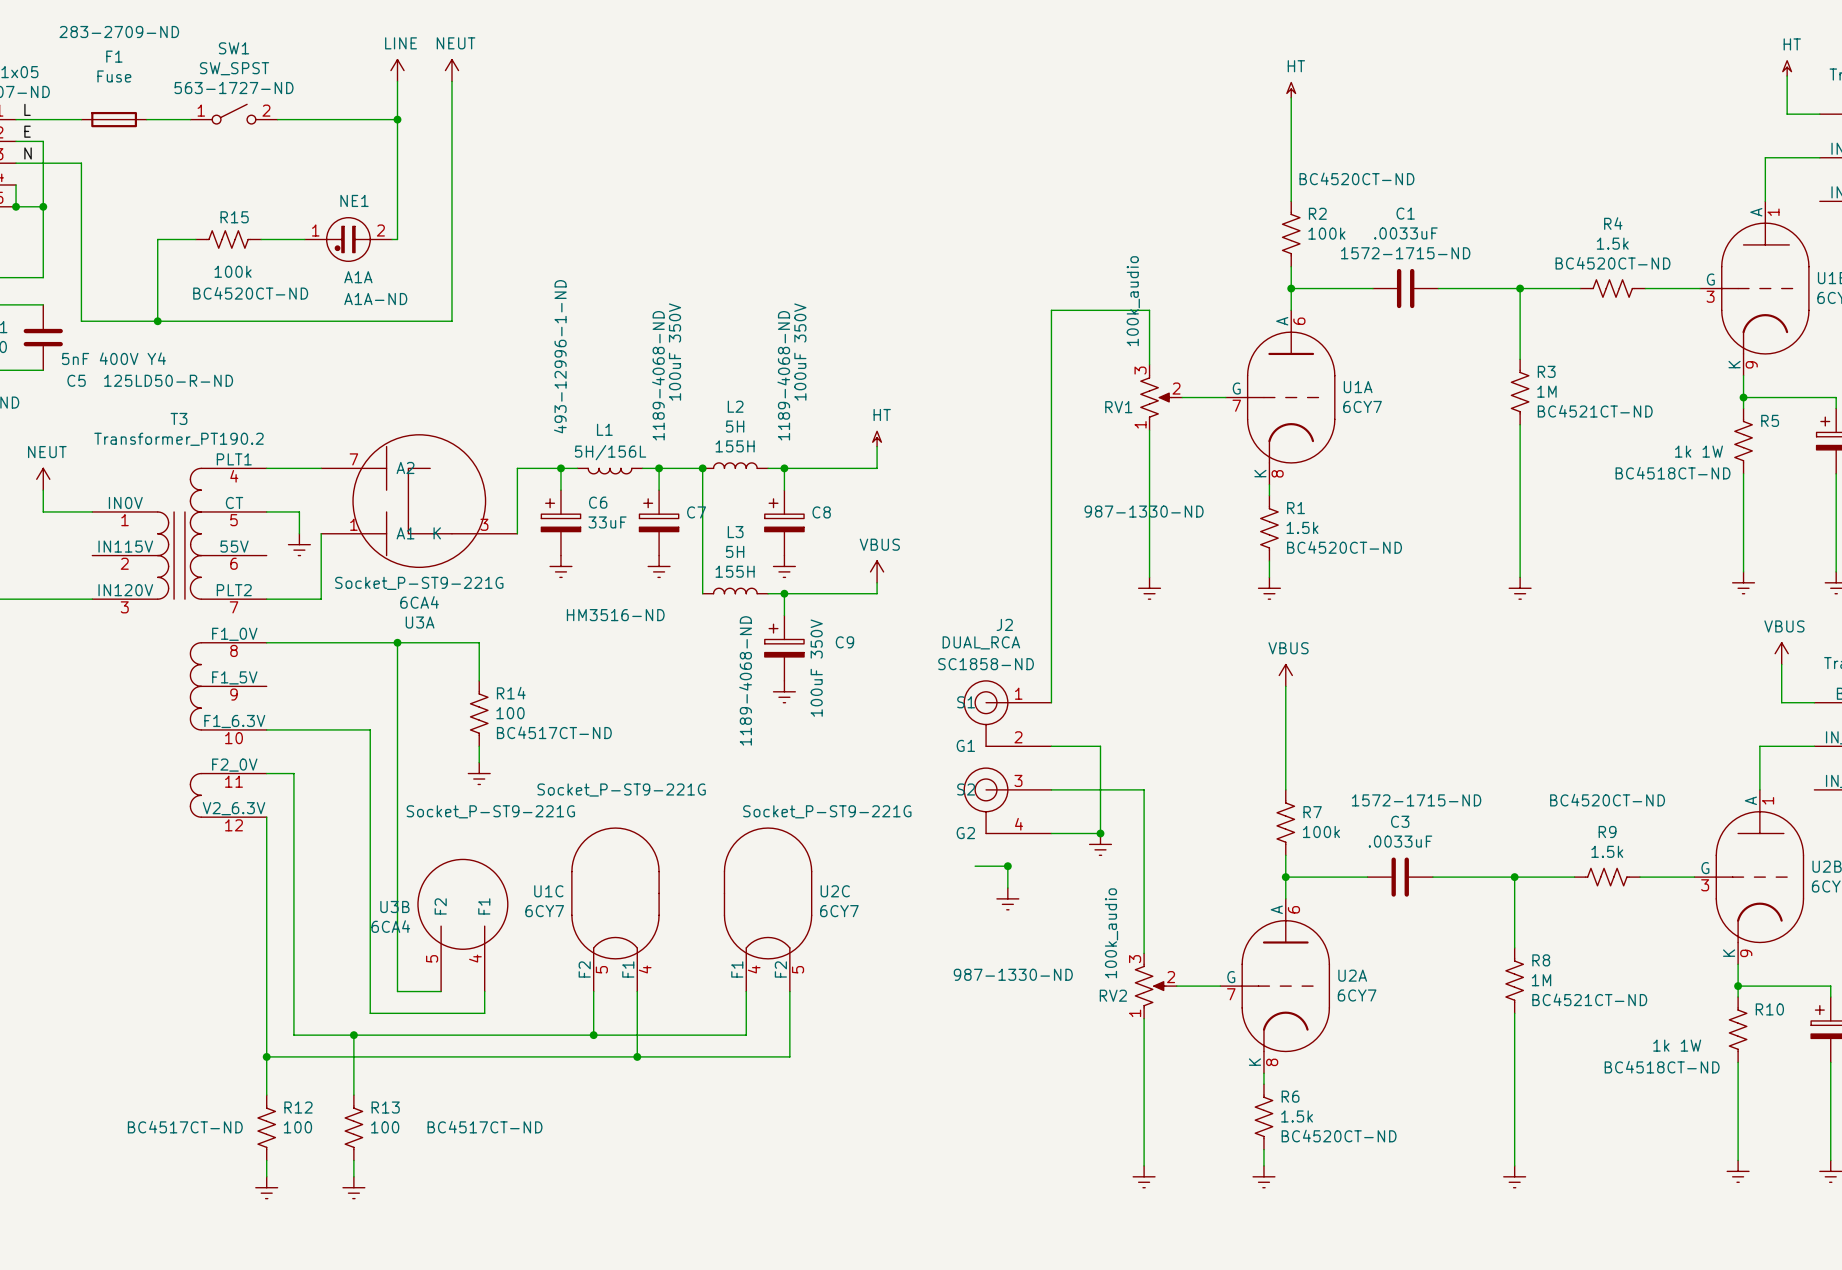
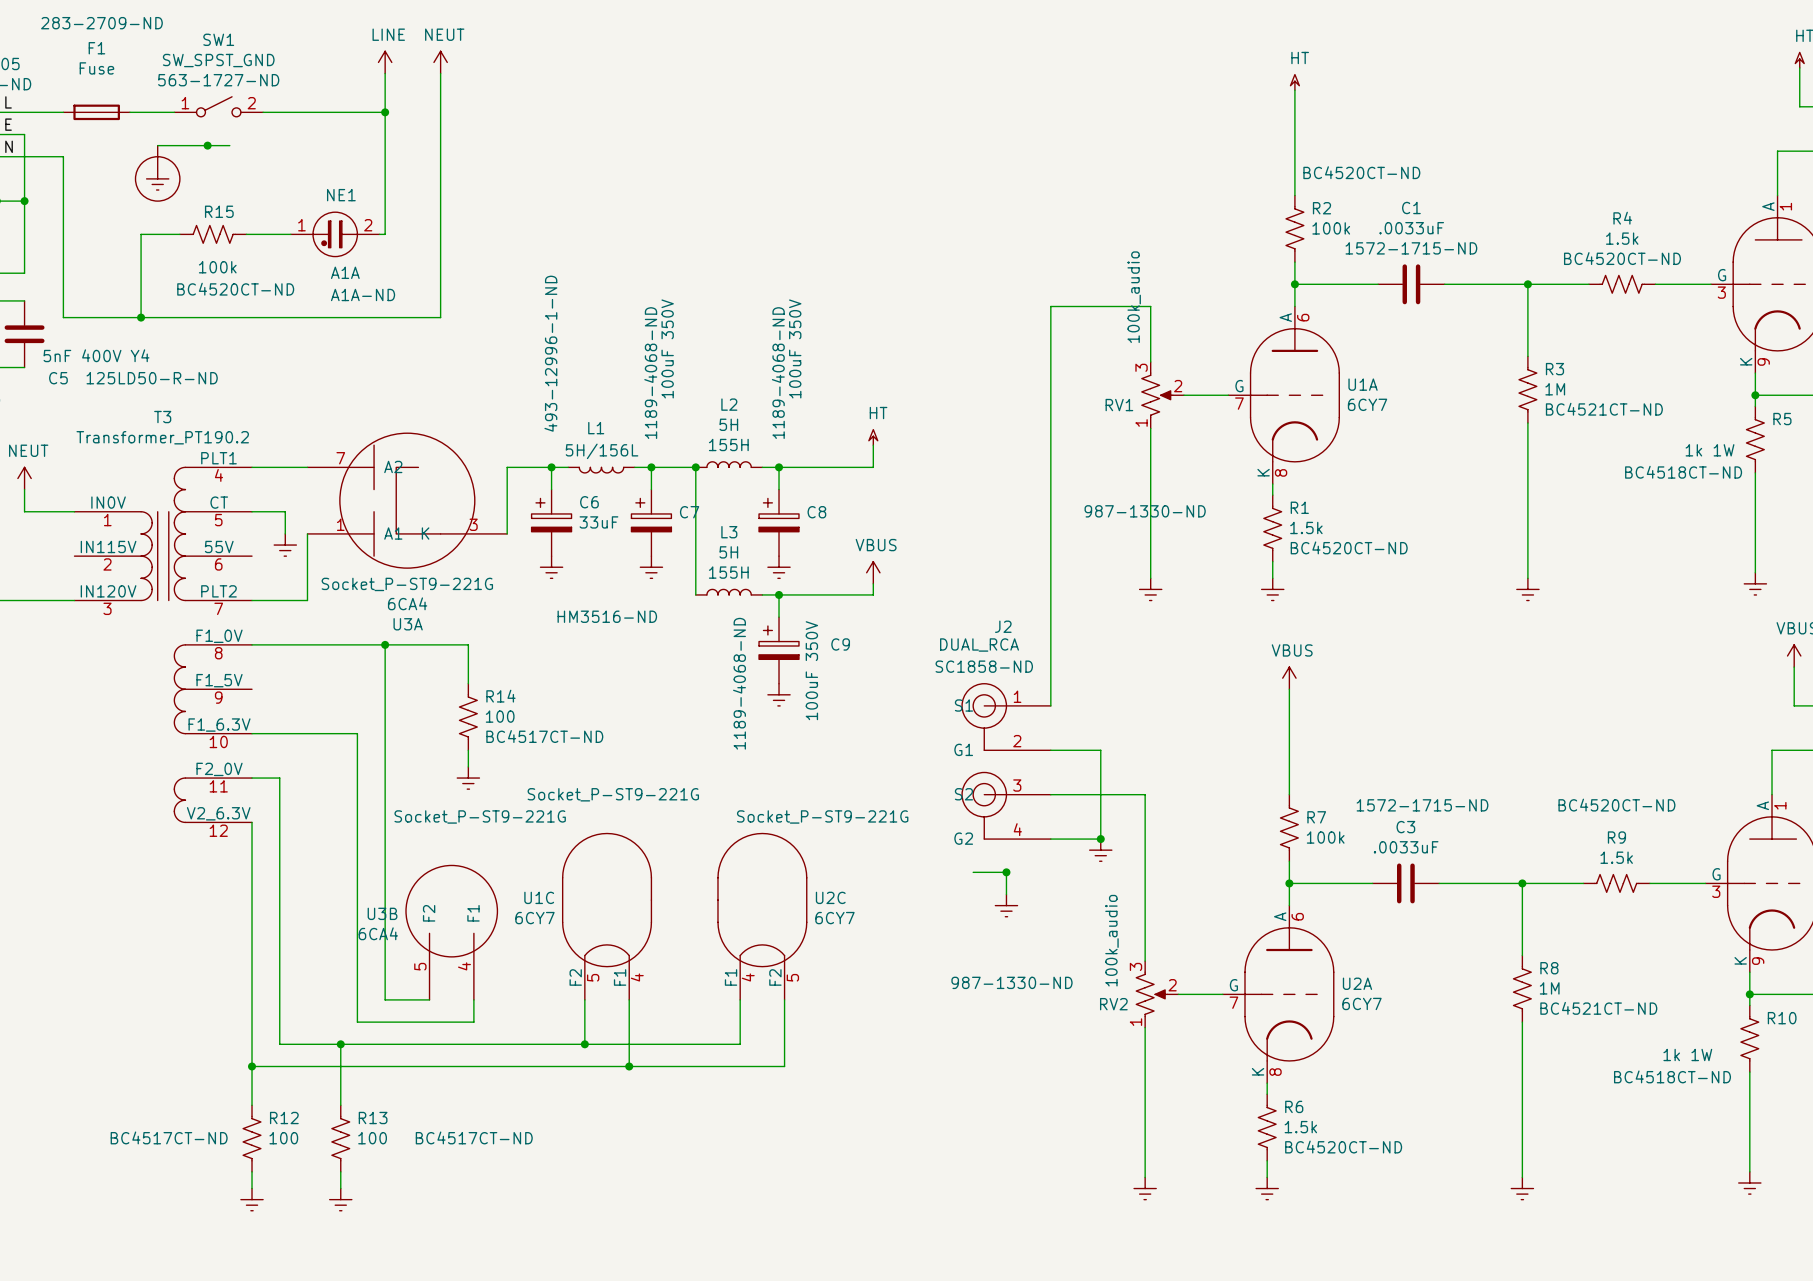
SW1 value: SW_SPST (234, 68) -> SW_SPST_GND (218, 60)
wire: none -> (157, 145) (229, 145)
junction: none -> (207, 145)
power symbol: none -> (157, 173)

